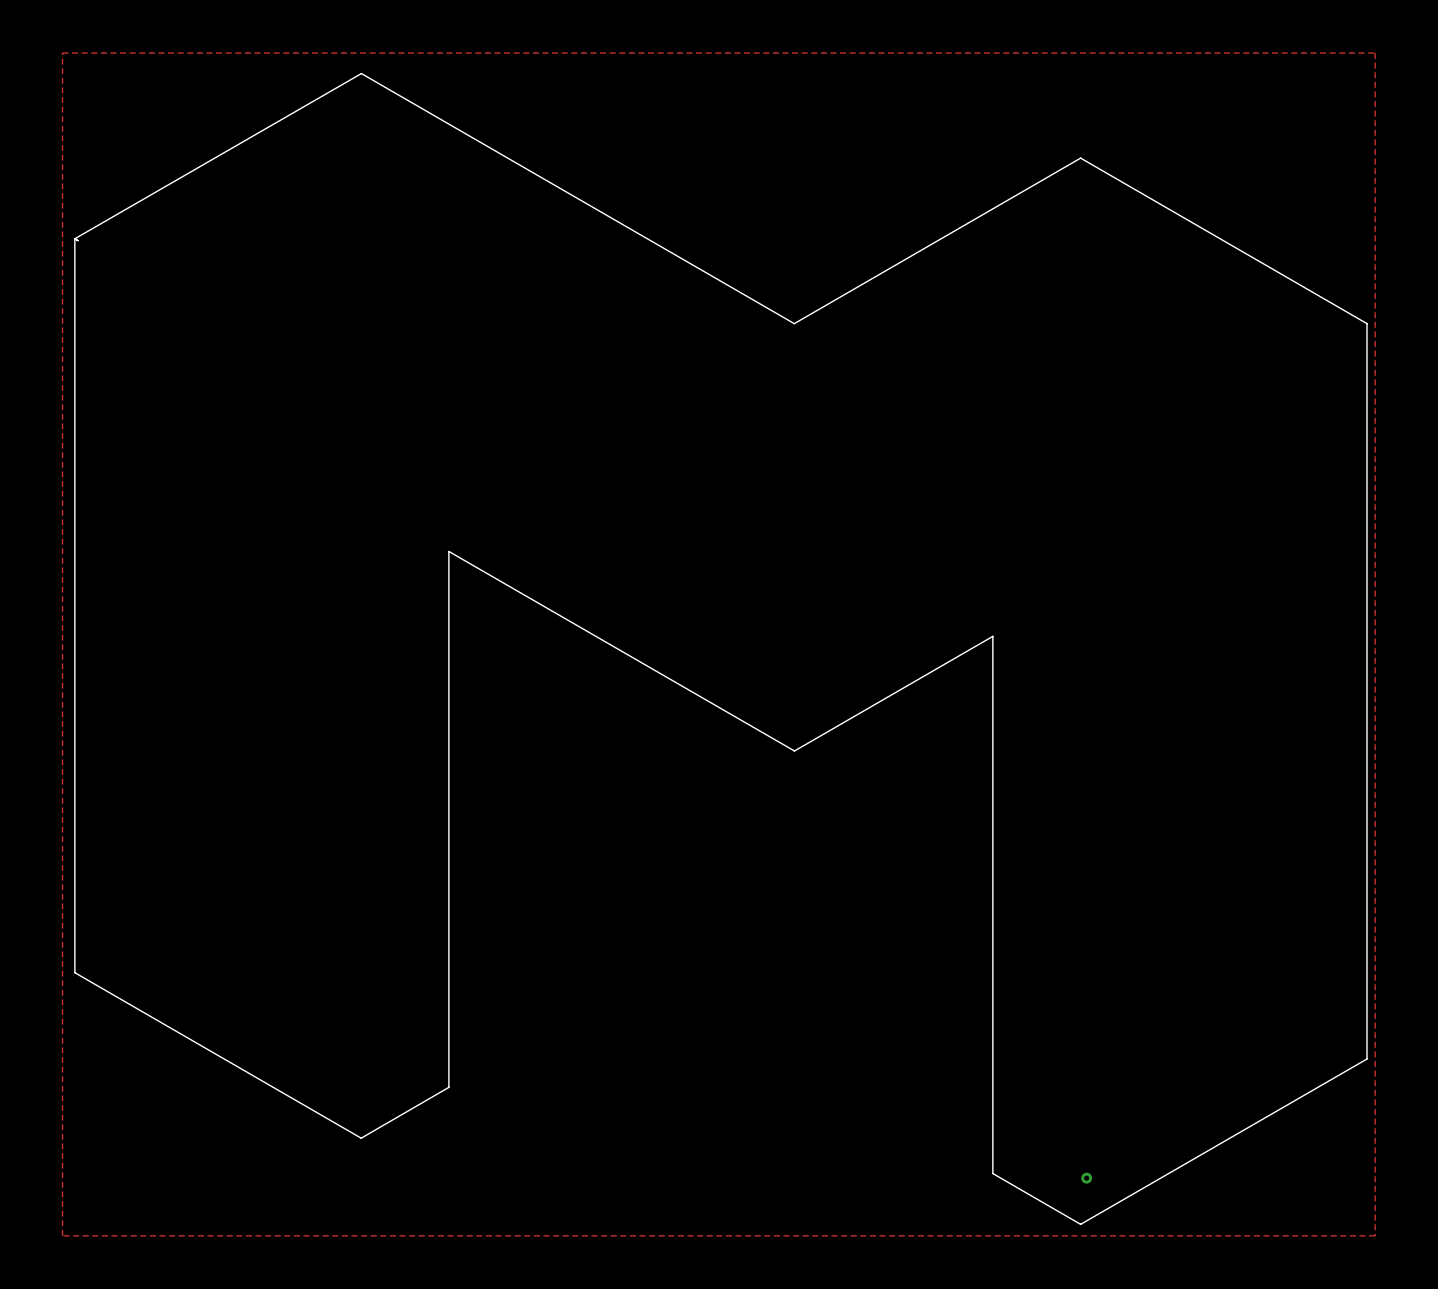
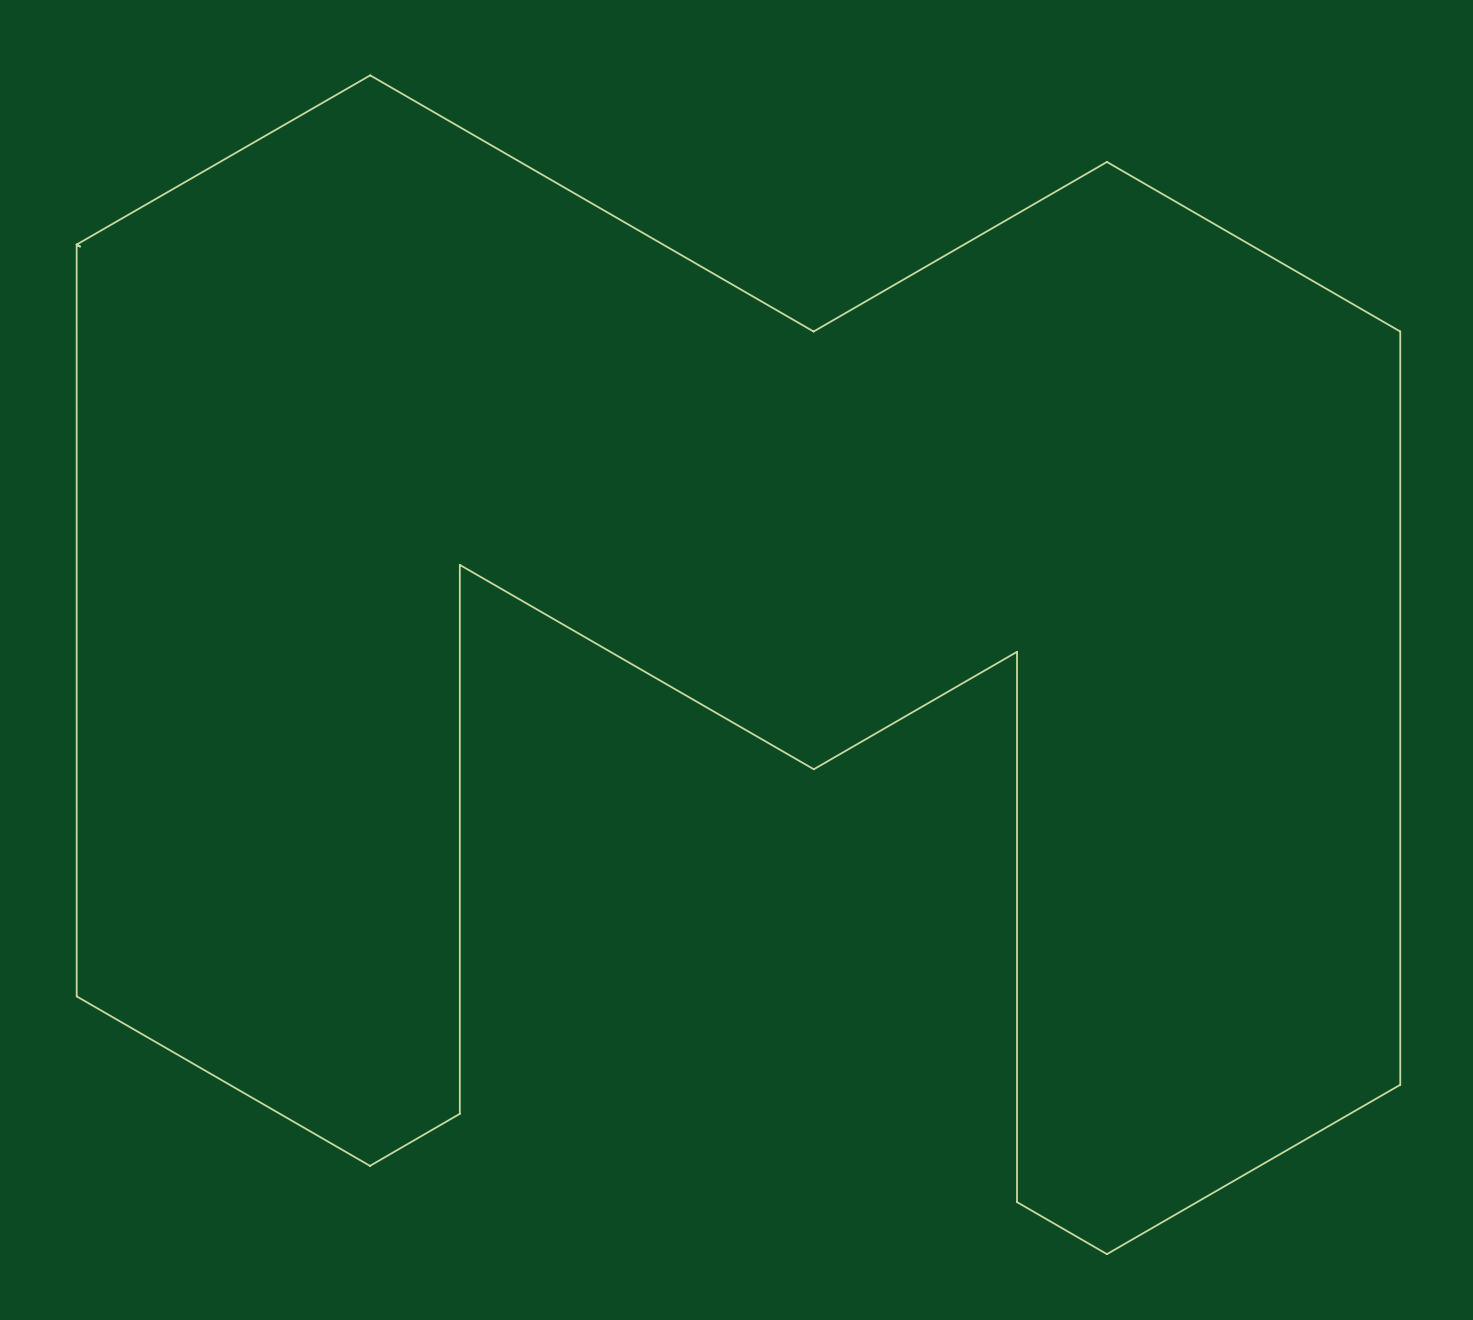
zone outline: (62, 53) (1375, 53) (1375, 1235) (62, 1235) (62, 53) -> none
via: (1086, 1178) -> none

